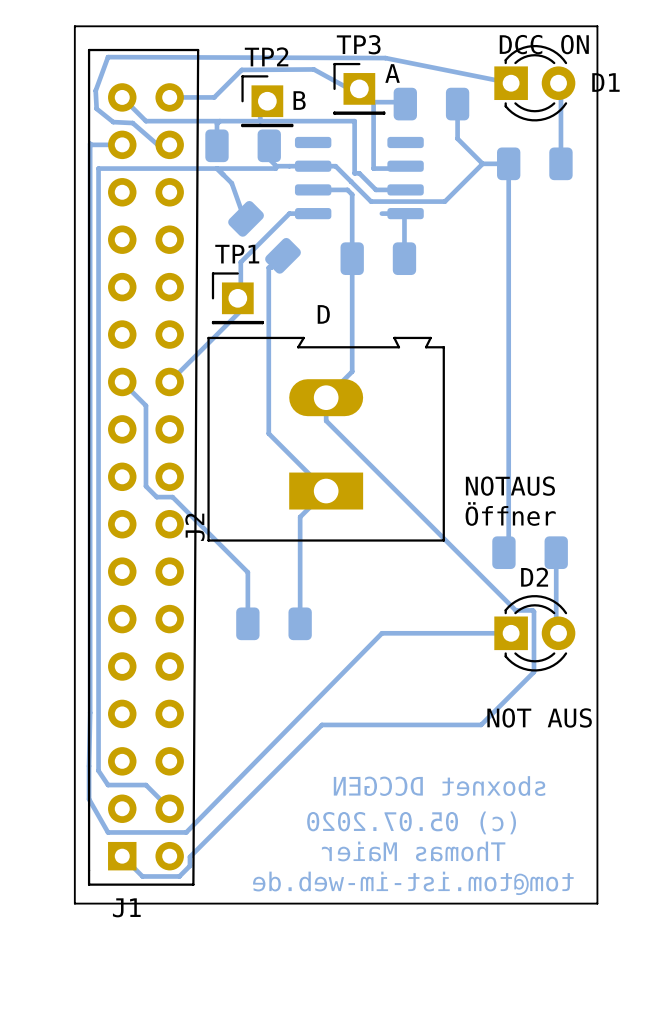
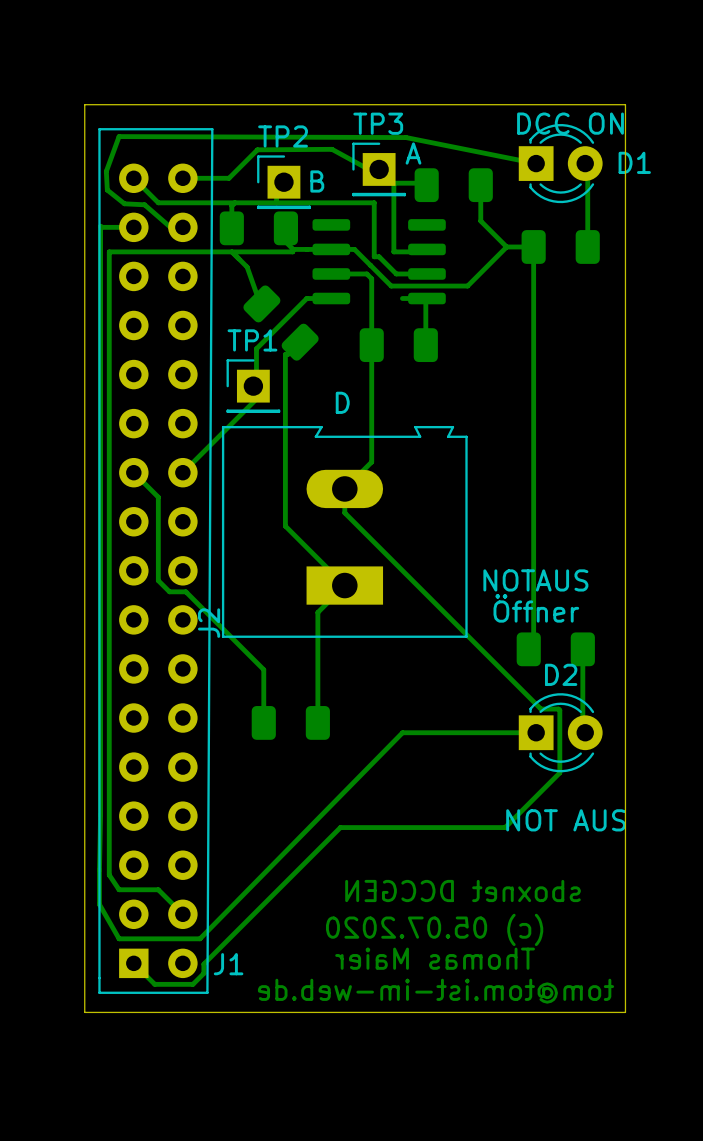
J1 name position: J1 (126, 907) -> J1 (228, 964)

